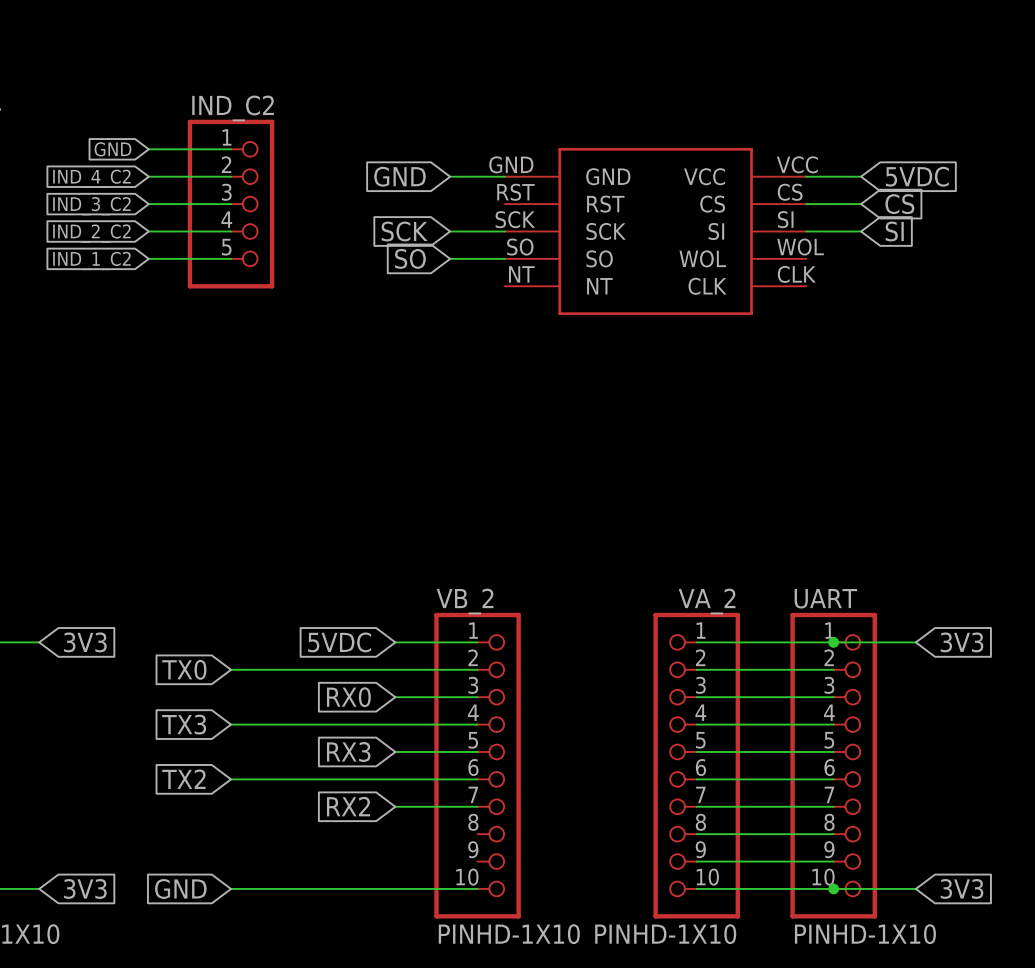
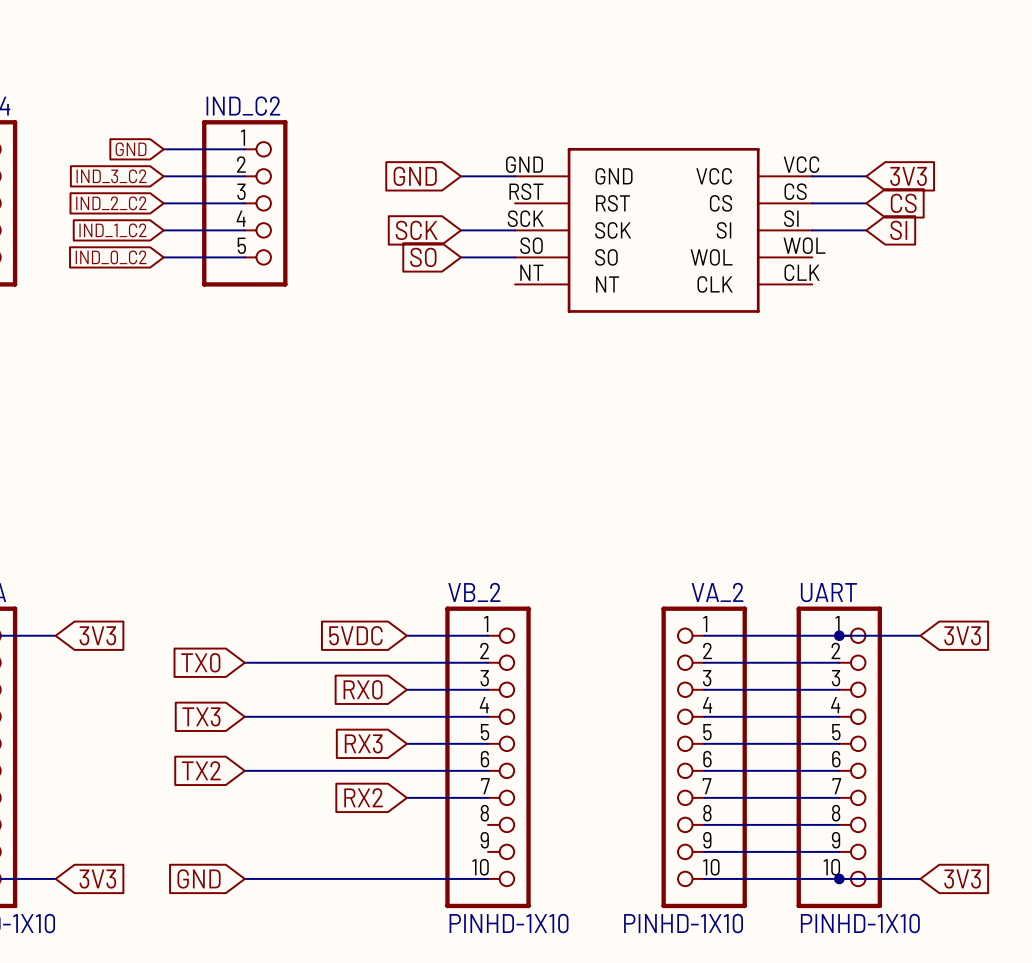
global label: 5VDC (917, 176) -> 3V3 (908, 176)
global label: IND_4_C2 (91, 178) -> IND_3_C2 (111, 176)
global label: IND_3_C2 (91, 206) -> IND_2_C2 (111, 203)
global label: IND_2_C2 (91, 233) -> IND_1_C2 (112, 230)
global label: IND_1_C2 (91, 260) -> IND_0_C2 (111, 257)

